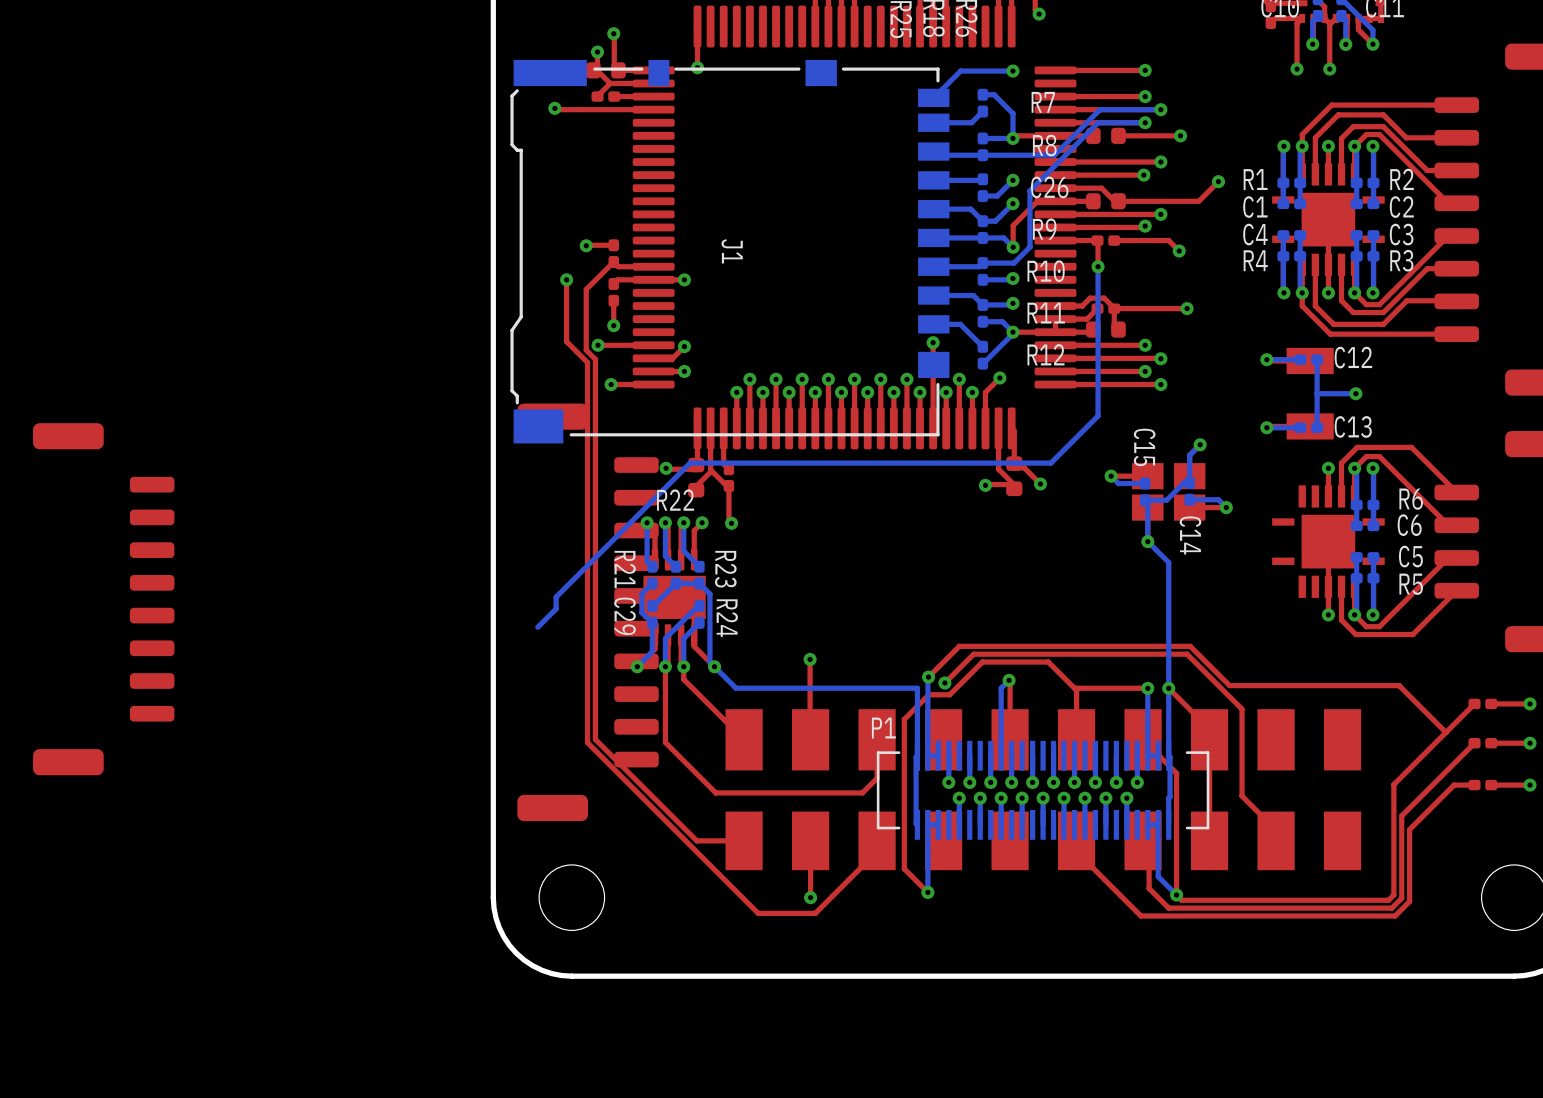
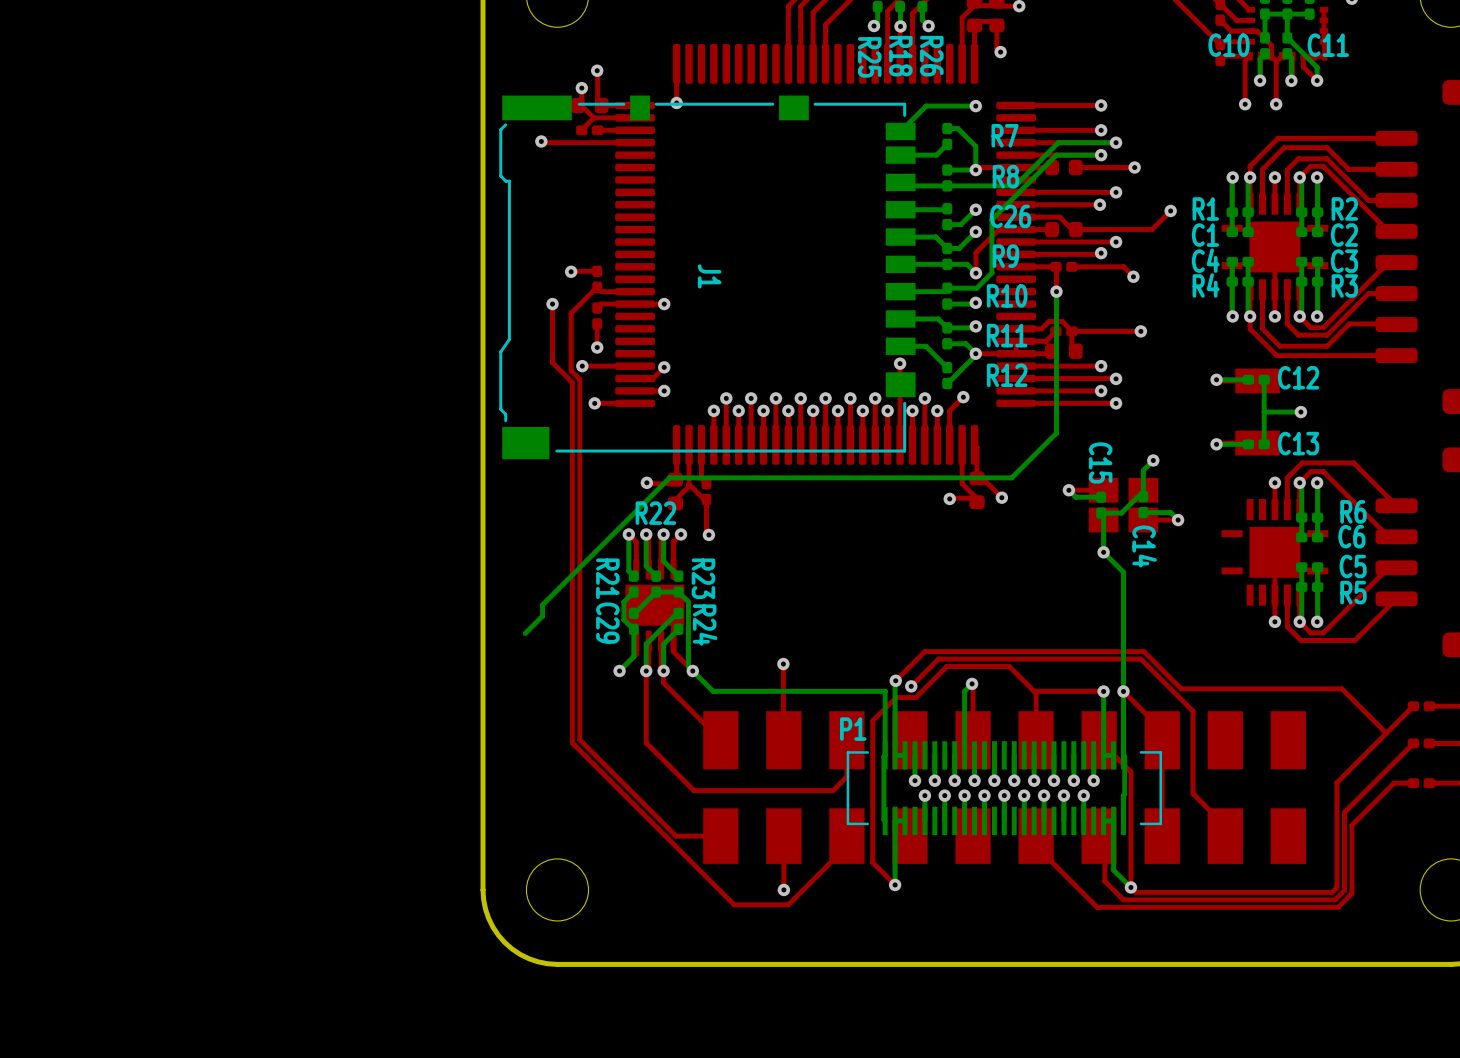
part: (103, 599) -> none
part: (588, 612) -> none

